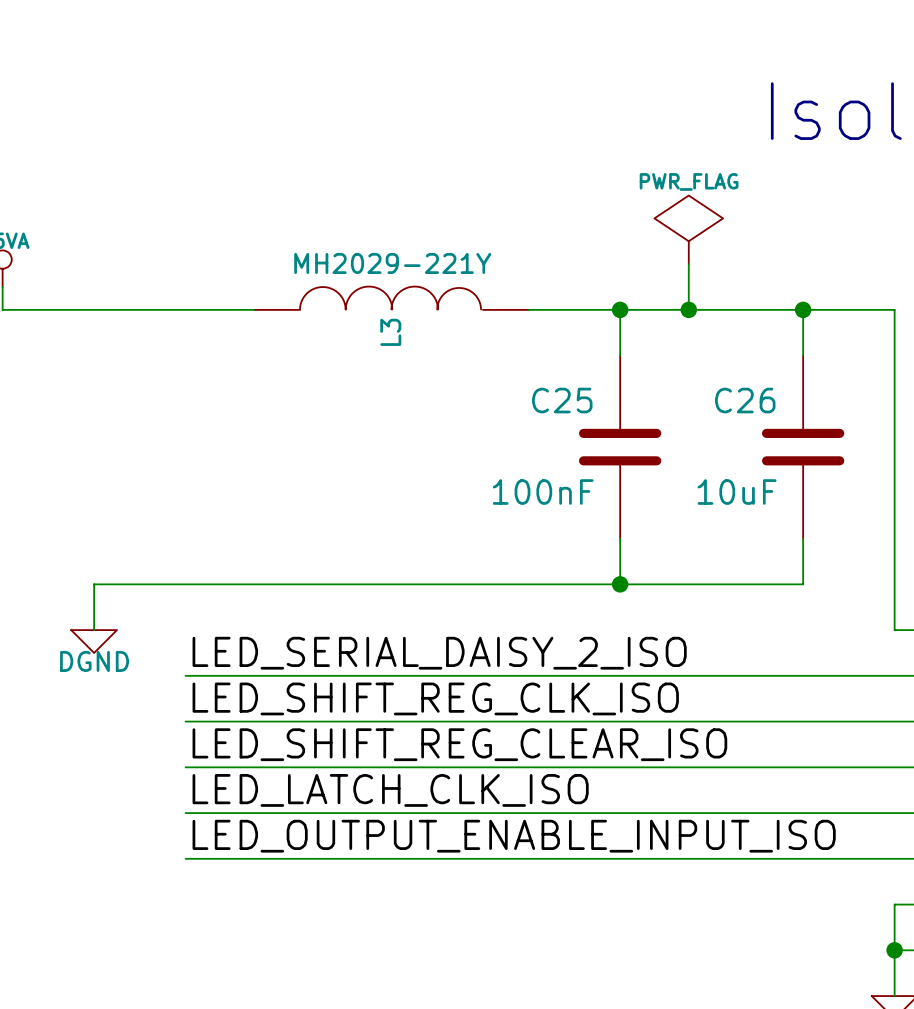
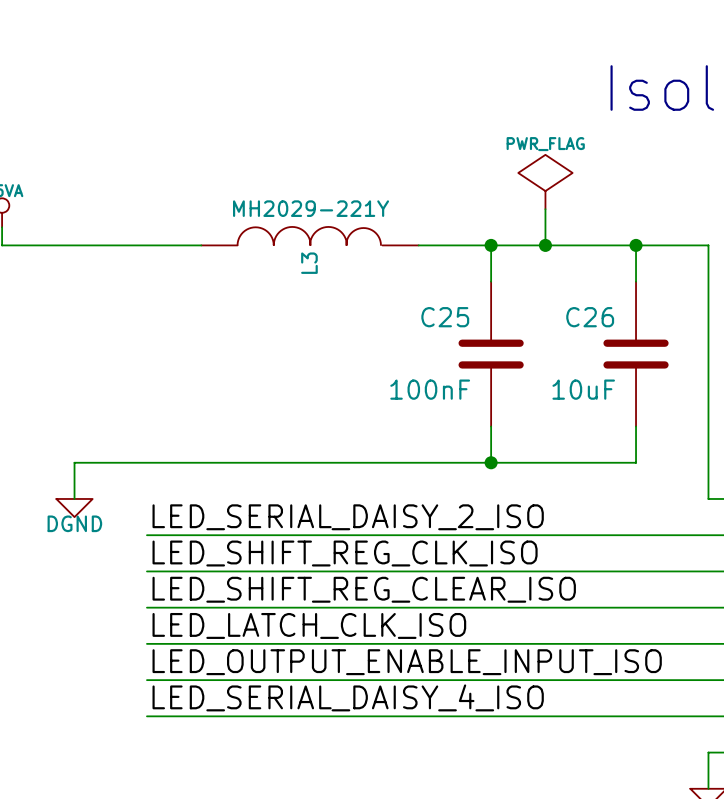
label: none -> LED_SERIAL_DAISY_4_ISO (348, 697)
wire: (894, 904) (894, 950) -> (708, 716) (146, 716)
junction: (894, 950) -> none

